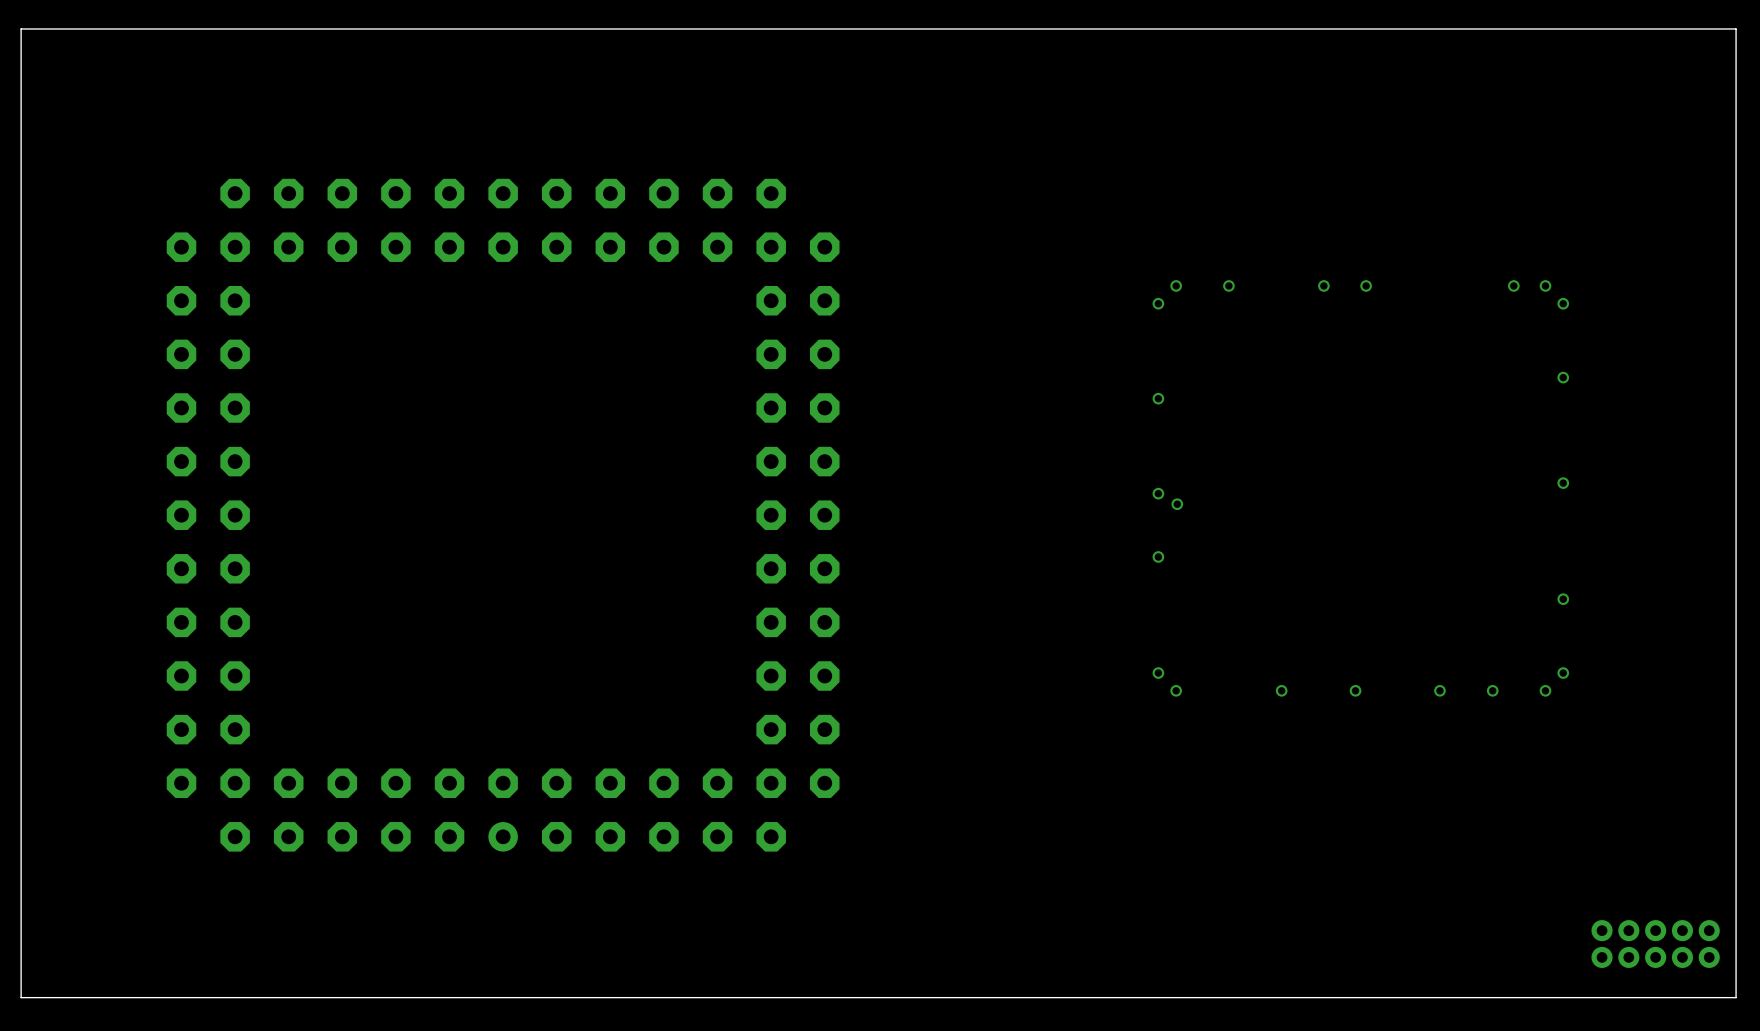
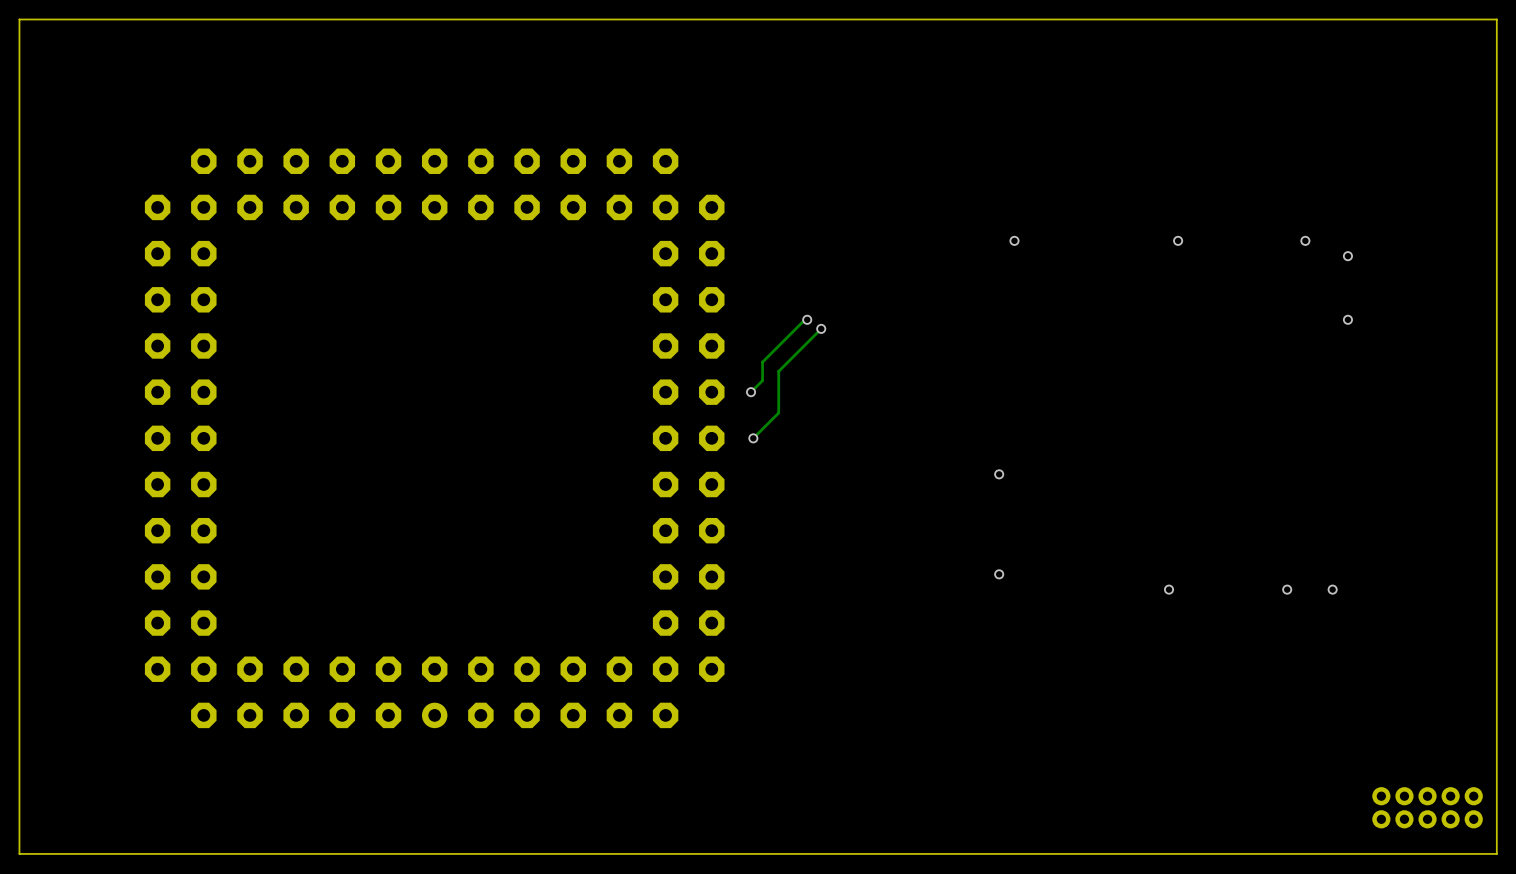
via: (1228, 285) -> none
via: (1323, 285) -> none
via: (1545, 285) -> none
via: (1158, 303) -> none
track: none -> (807, 319) (804, 319) (762, 362) (762, 380) (751, 392)
via: none -> (807, 319)
track: none -> (821, 328) (778, 371) (778, 412) (753, 438)
via: none -> (821, 328)
via: (1158, 398) -> none
via: none -> (751, 392)
via: (1563, 483) -> none
via: (1158, 493) -> none
via: (1177, 504) -> none
via: none -> (753, 438)
via: (1563, 599) -> none
via: (1563, 673) -> none
via: (1176, 690) -> none
via: (1281, 690) -> none
via: (1439, 690) -> none

